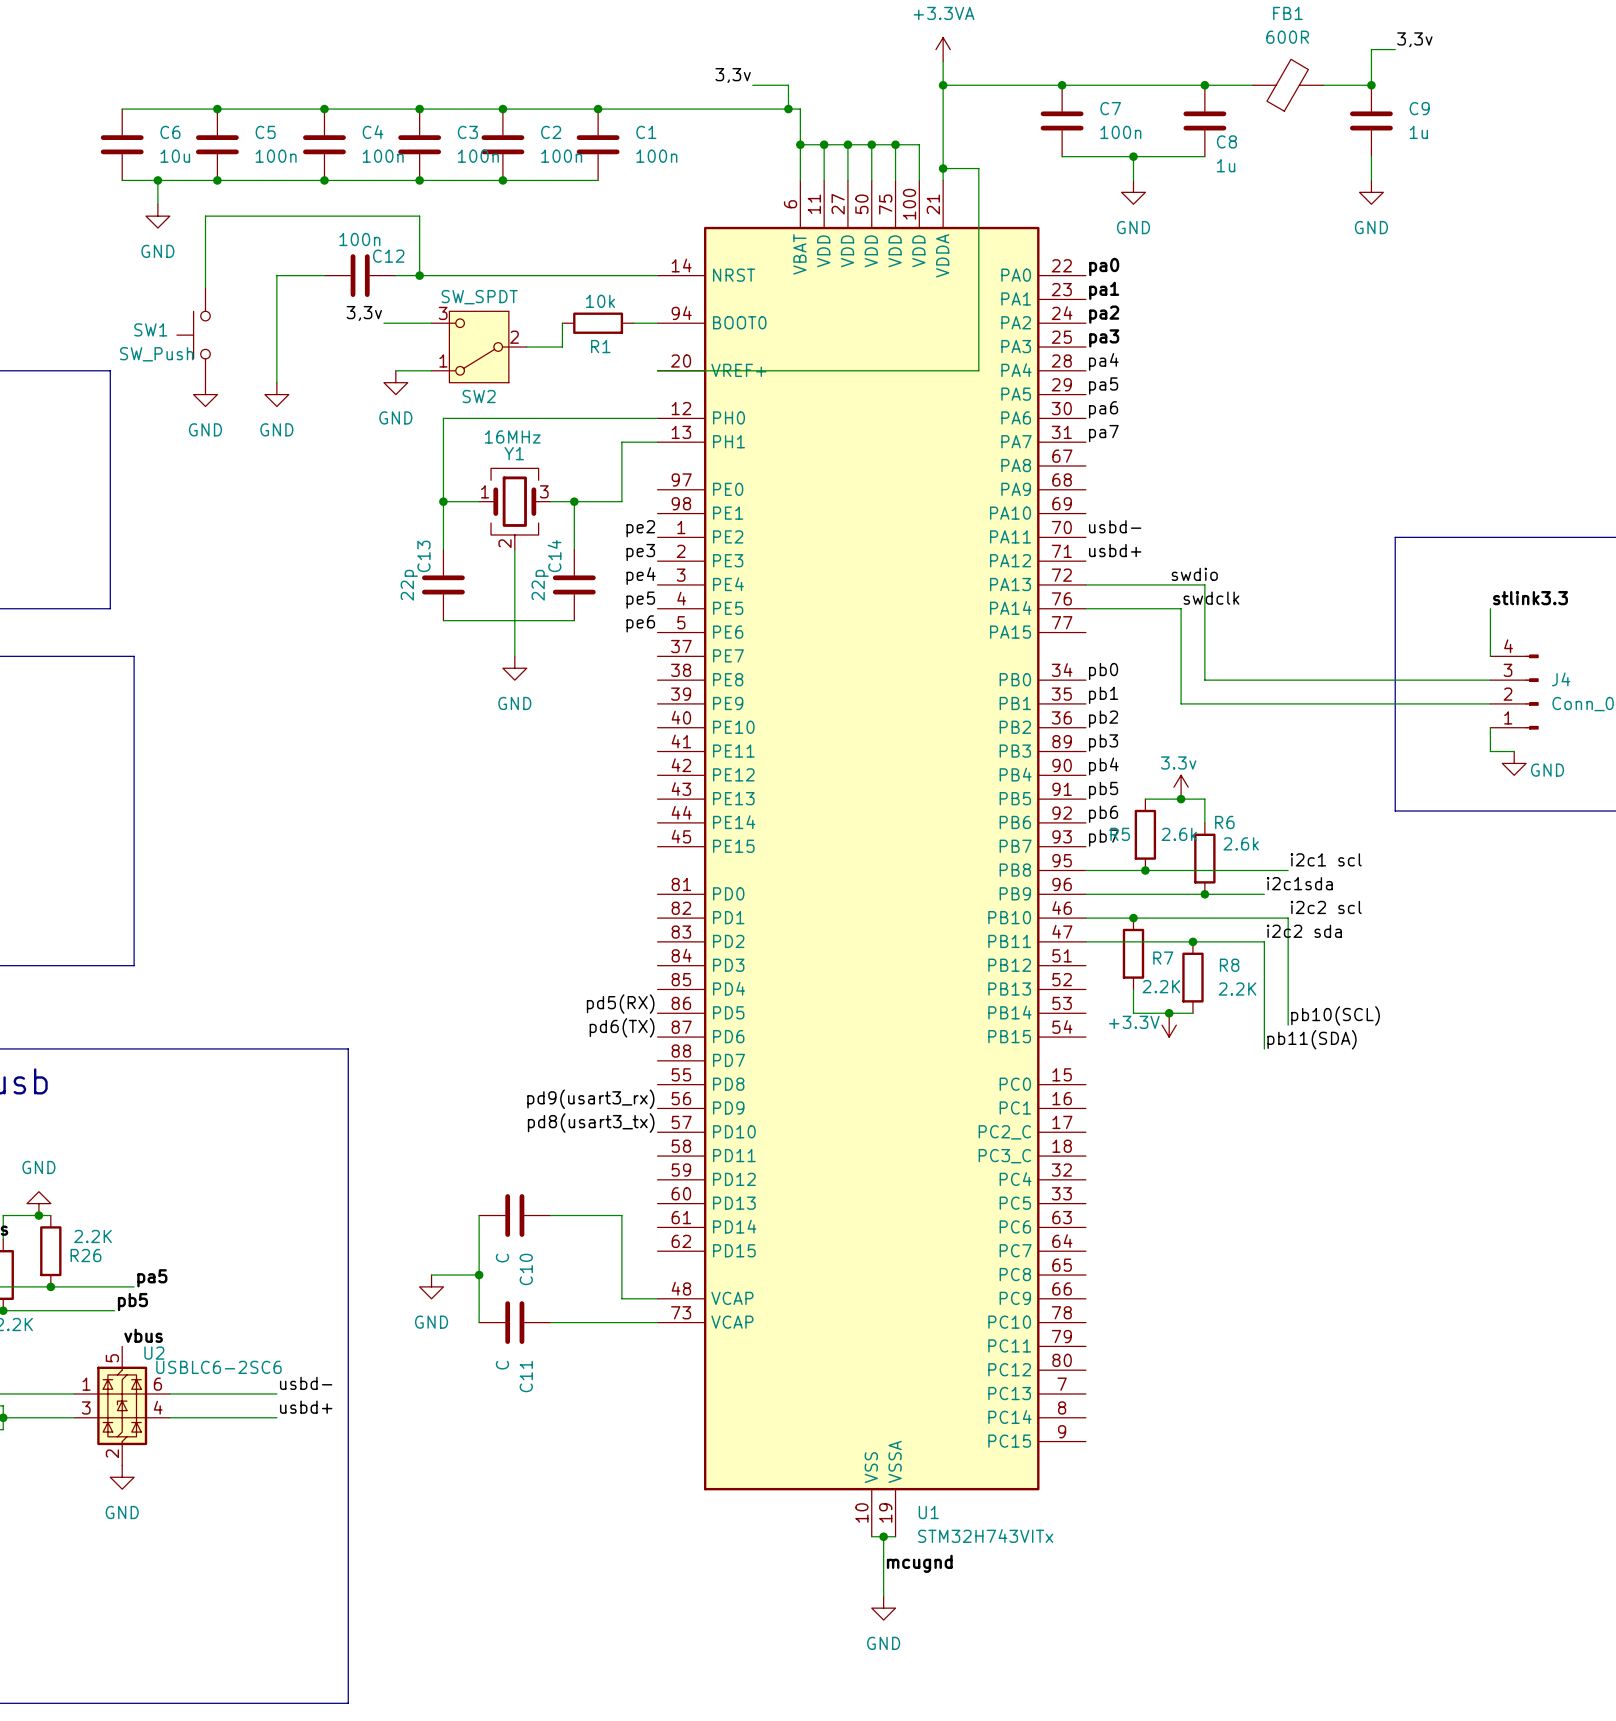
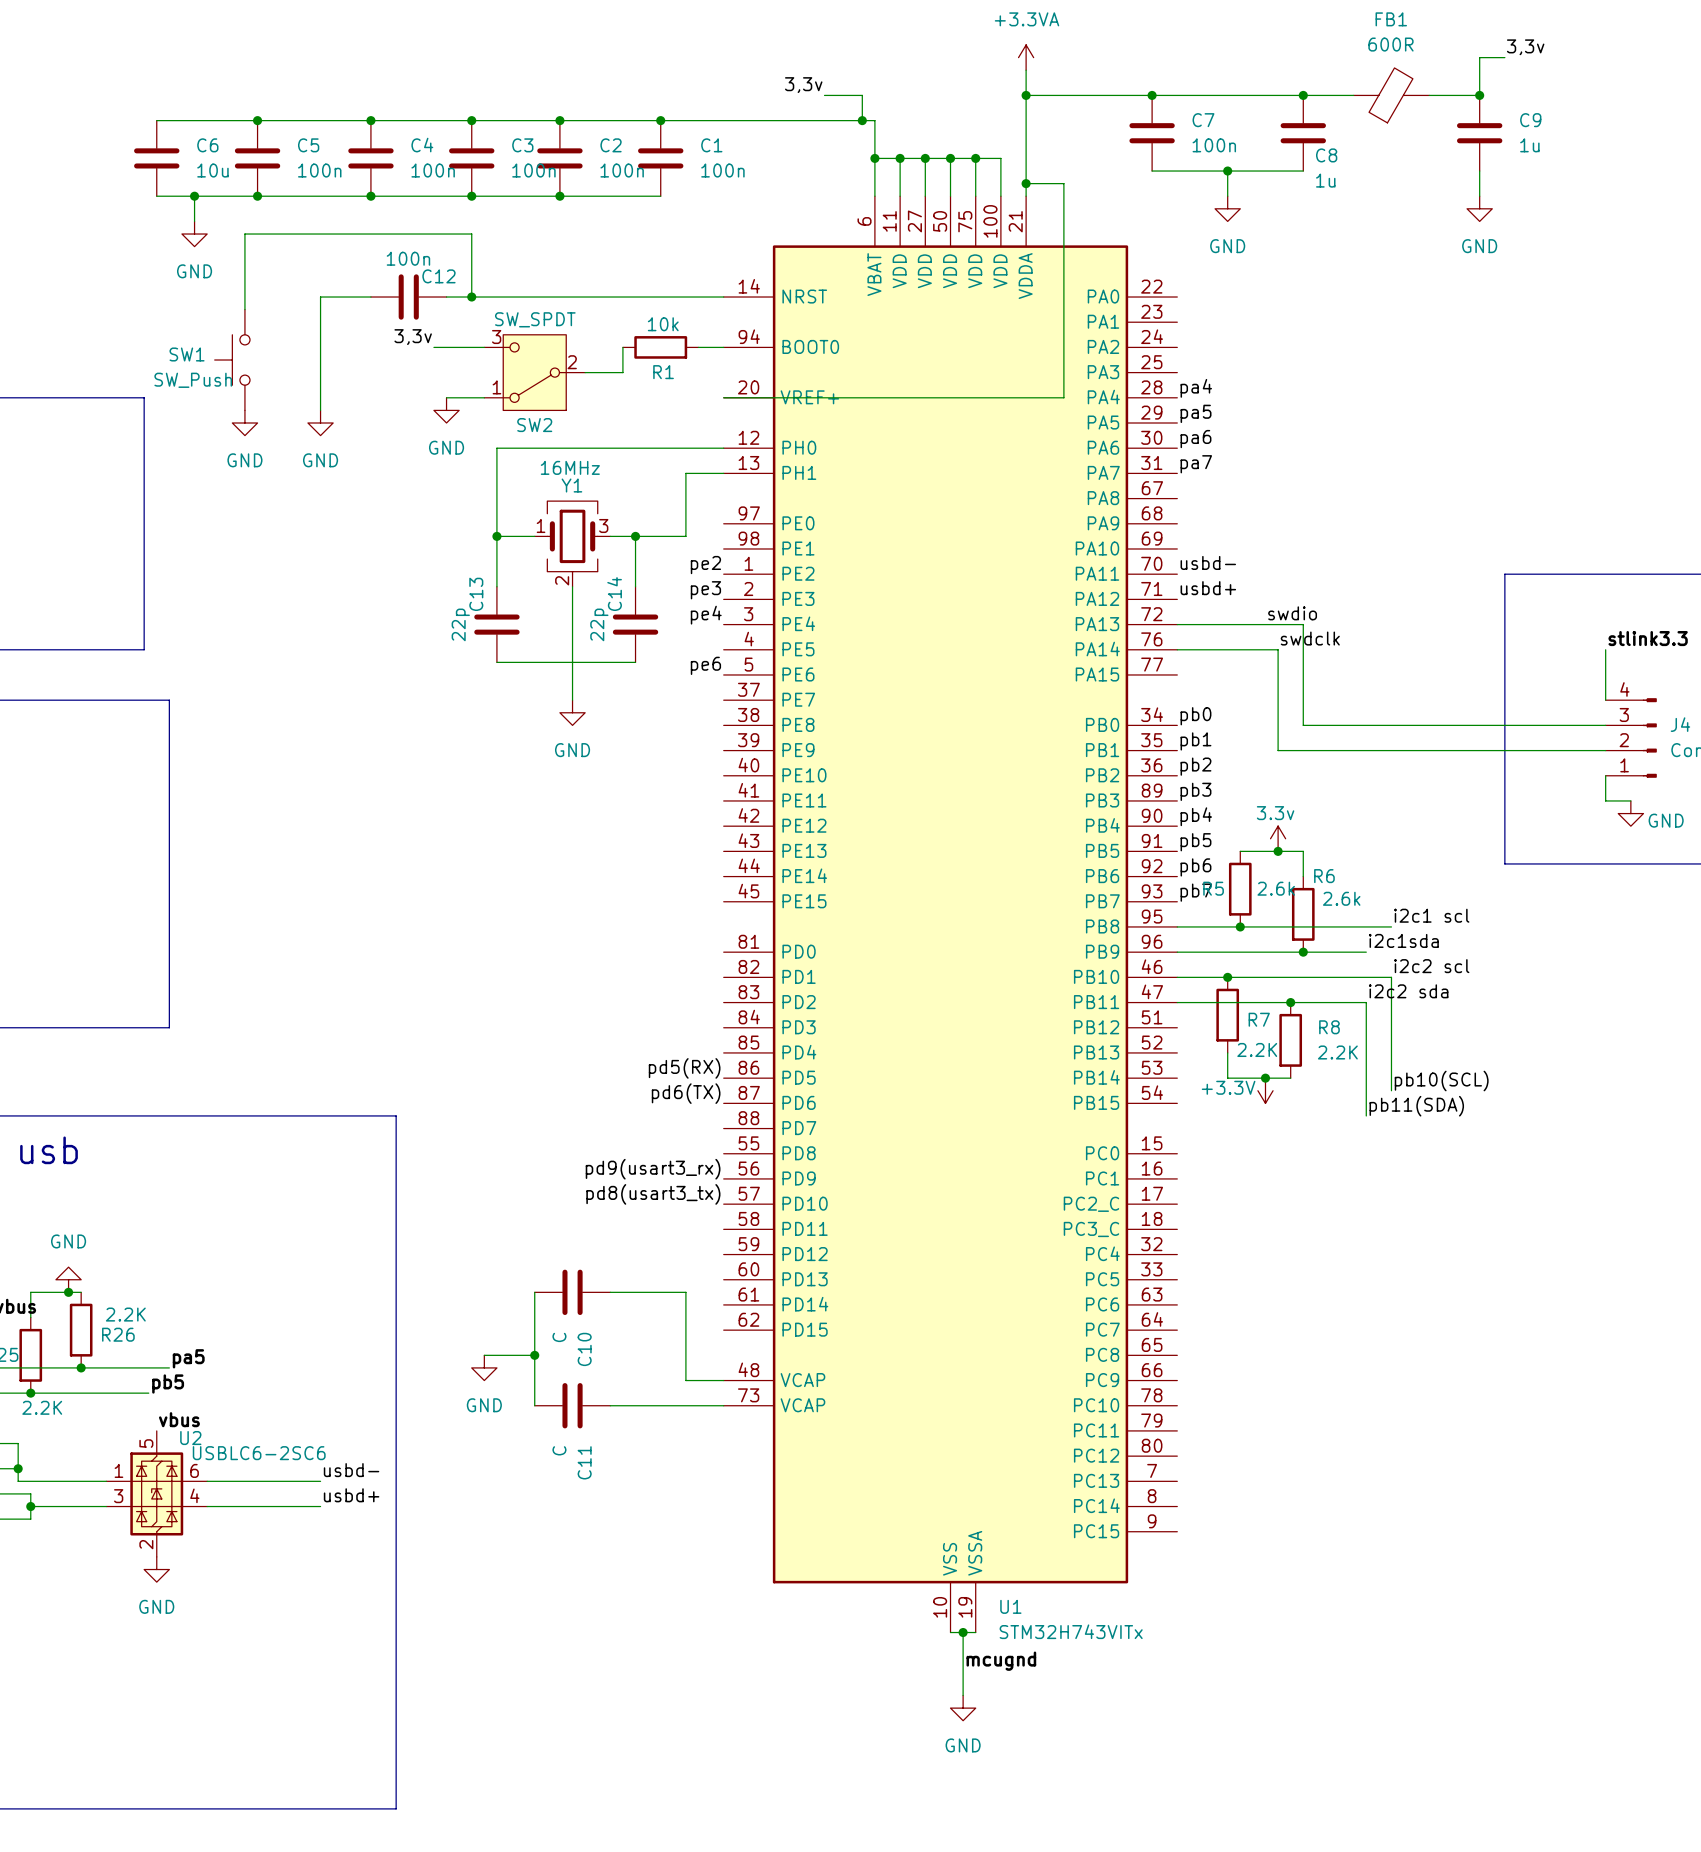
label: pa0 (1104, 266) -> none
label: pa1 (1104, 290) -> none
label: pa2 (1104, 314) -> none
label: pa3 (1104, 338) -> none
label: pe5 (640, 600) -> none

